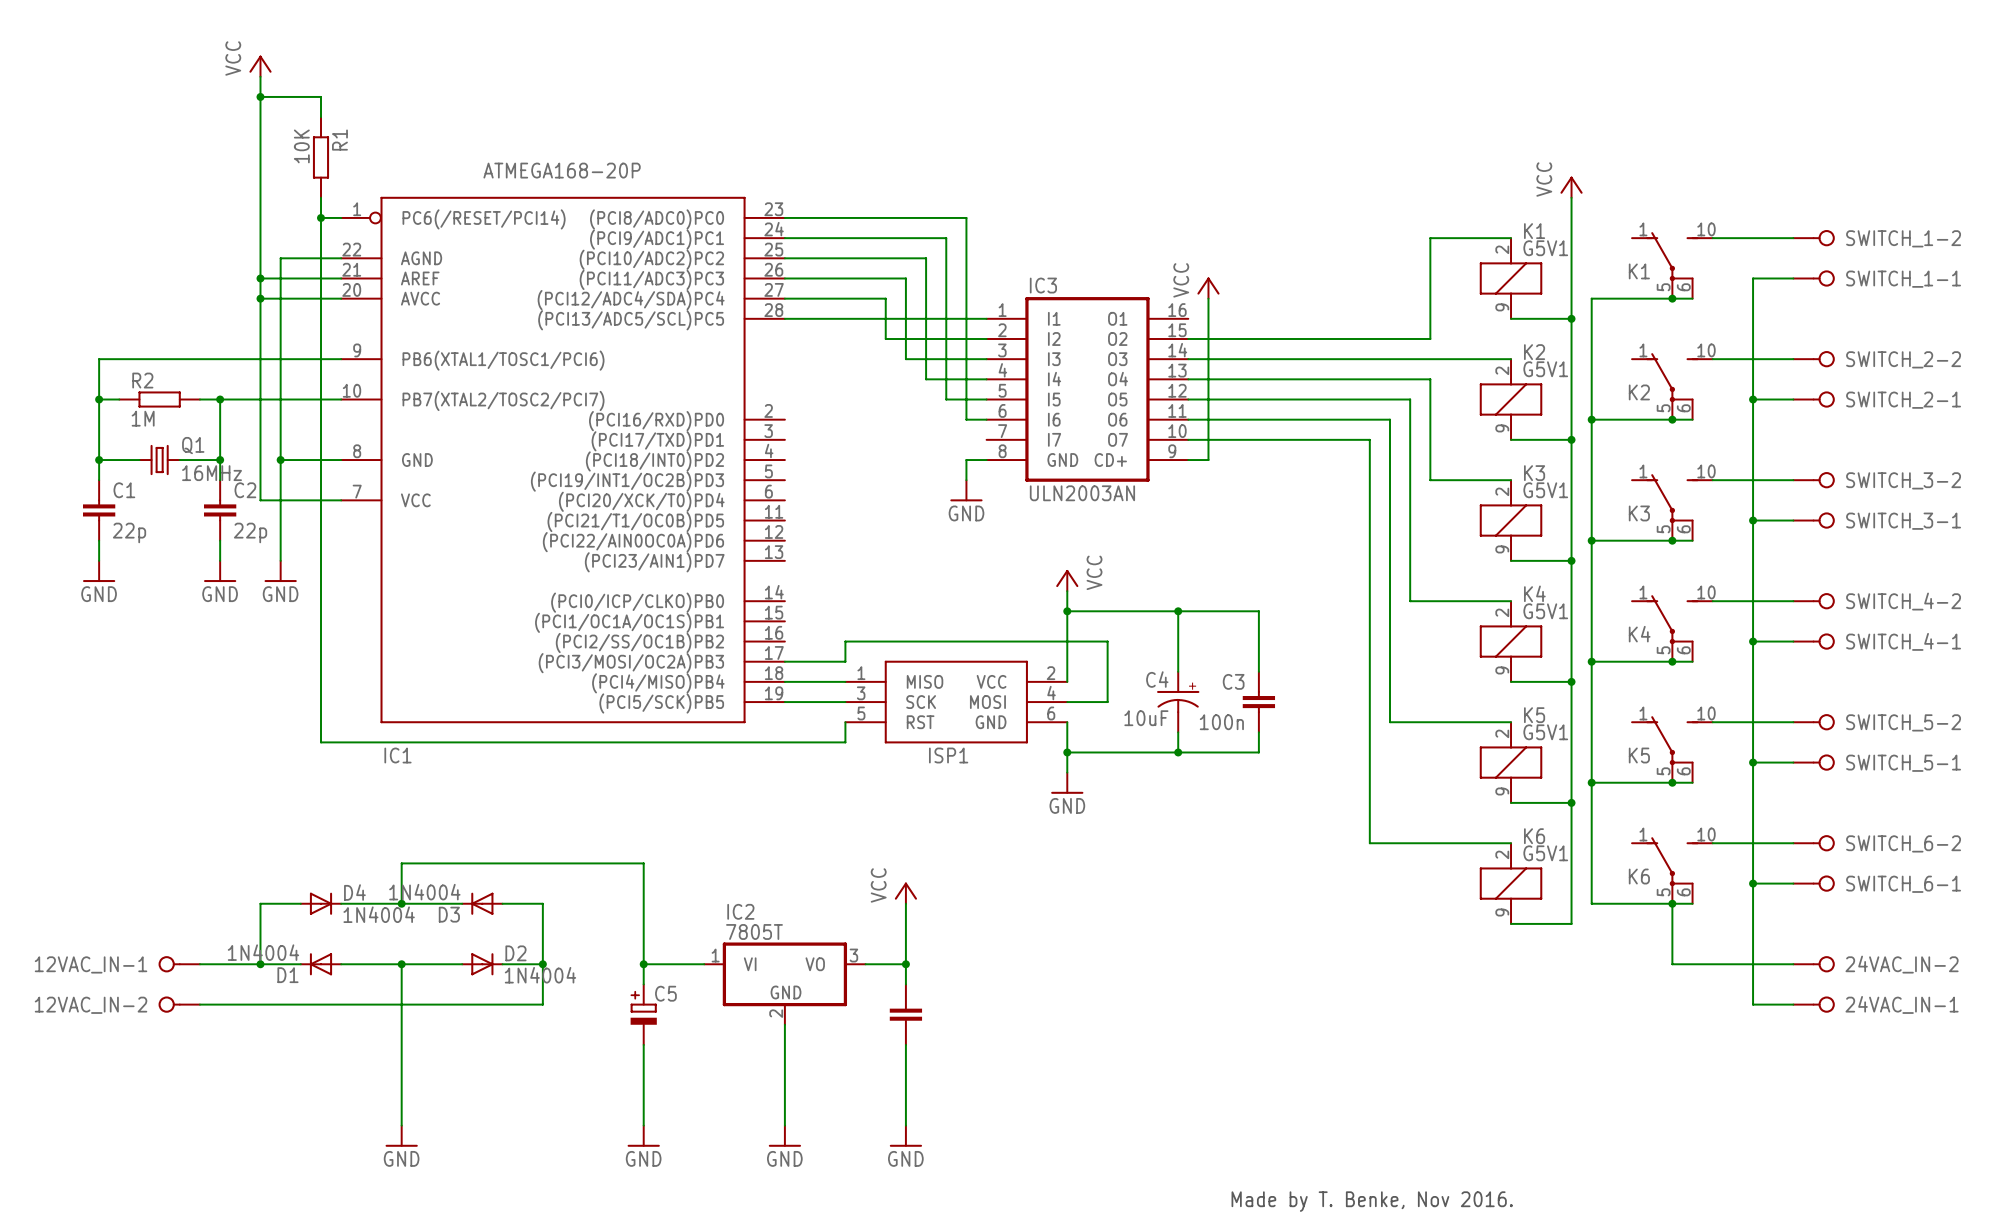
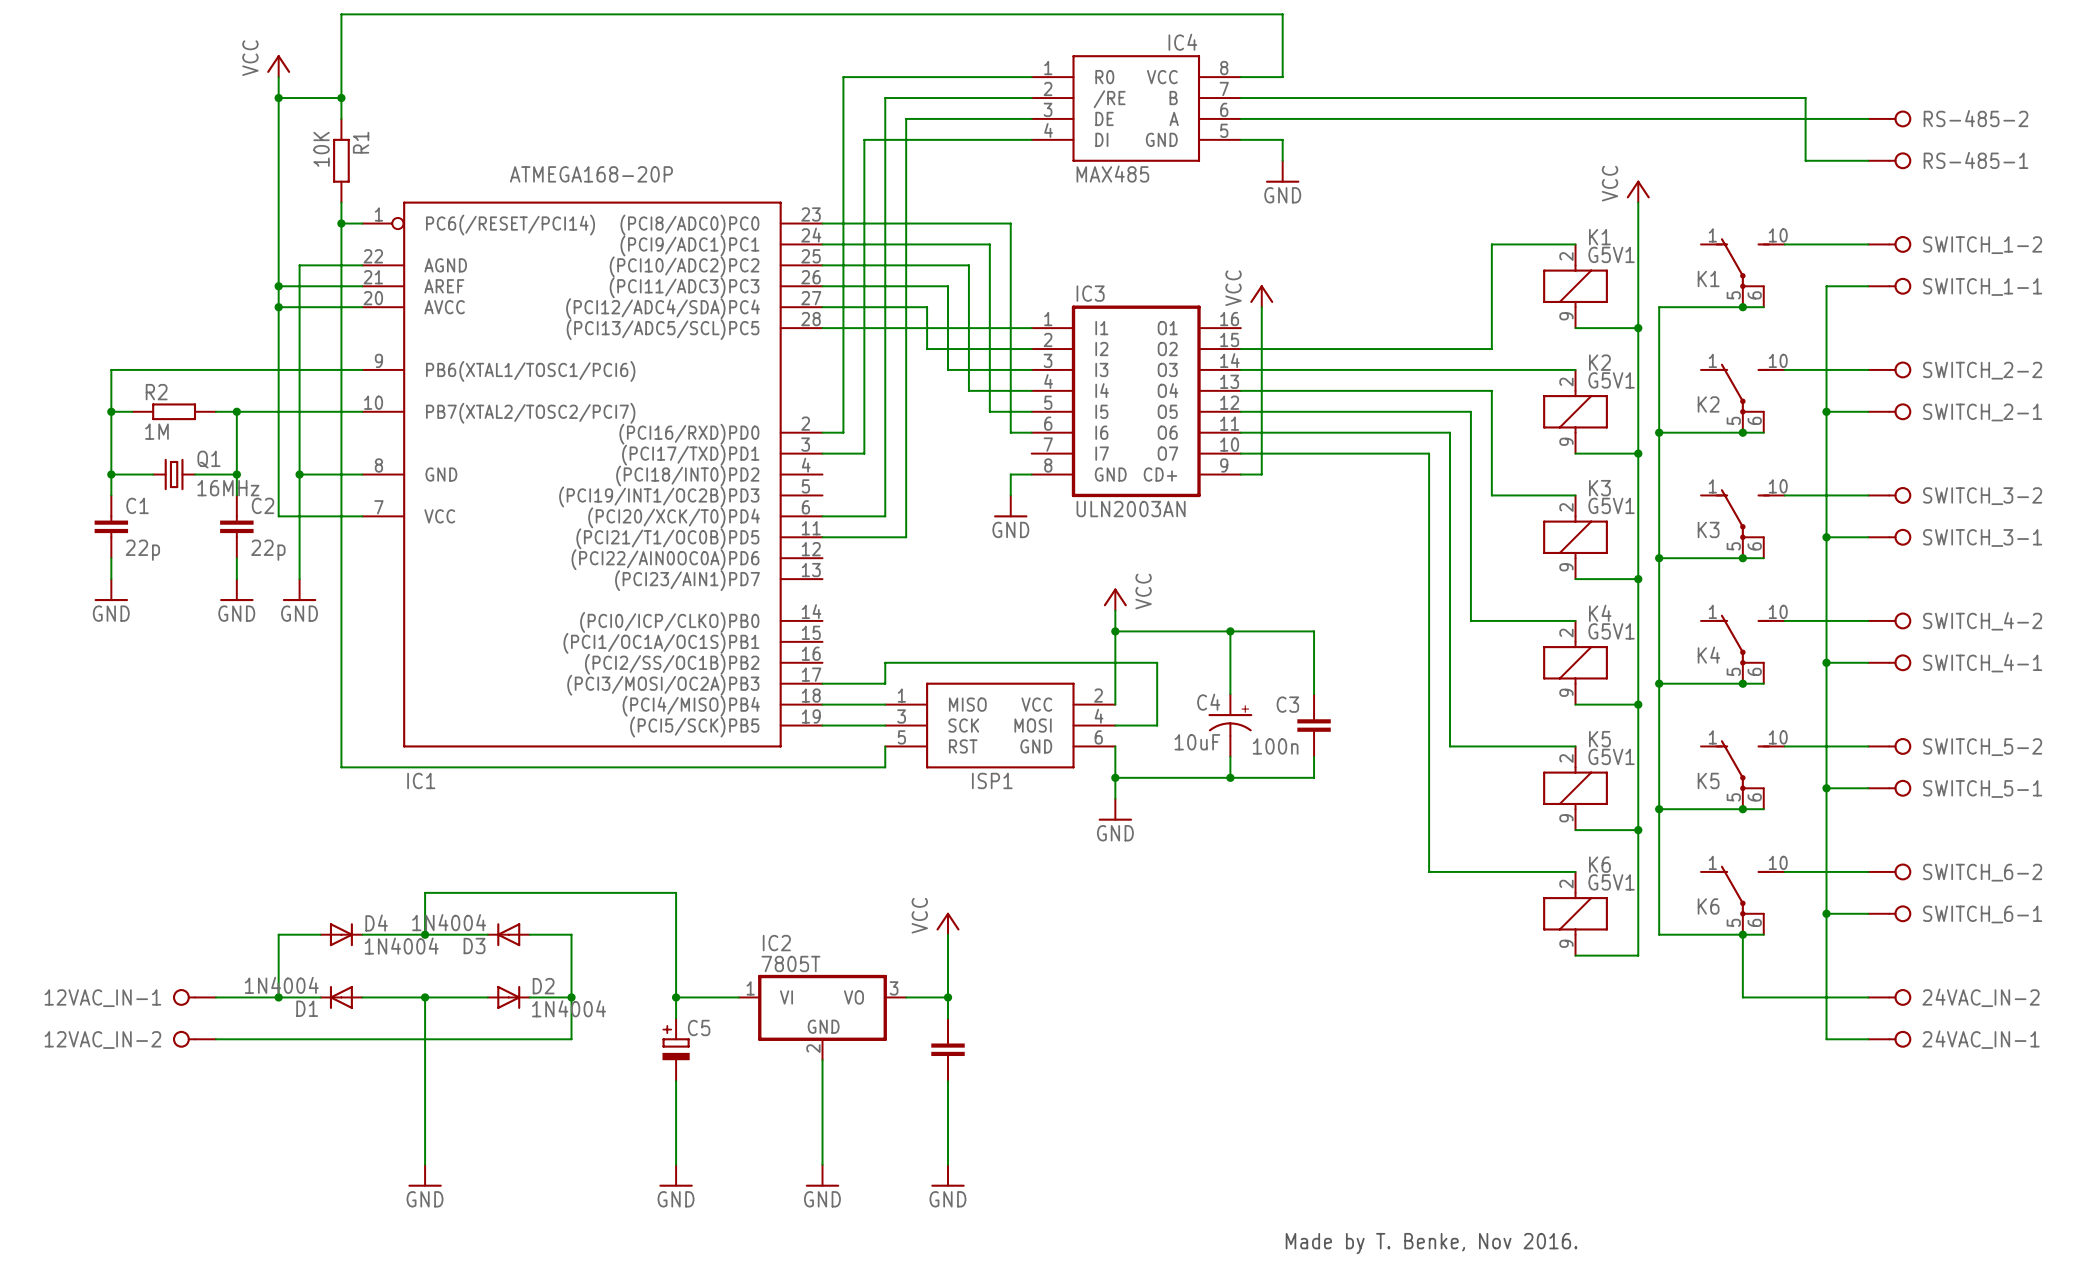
wire: none -> (1031, 77) (843, 77) (843, 432) (822, 432)
wire: none -> (1240, 77) (1282, 77) (1282, 14) (341, 14) (341, 98)
junction: none -> (341, 98)
wire: none -> (1031, 98) (885, 98) (885, 516) (822, 516)
wire: none -> (1240, 98) (1805, 98) (1805, 160) (1868, 160)
IC4: none -> MAX485 (1136, 108)
wire: none -> (1031, 118) (906, 118) (906, 537) (822, 537)
wire: none -> (1240, 118) (1868, 118)
RS-485-2: none -> (1889, 118)
wire: none -> (1031, 139) (864, 139) (864, 453) (822, 453)
wire: none -> (1240, 139) (1282, 139) (1282, 160)
RS-485-1: none -> (1889, 160)
power symbol: none -> GND (1282, 171)

